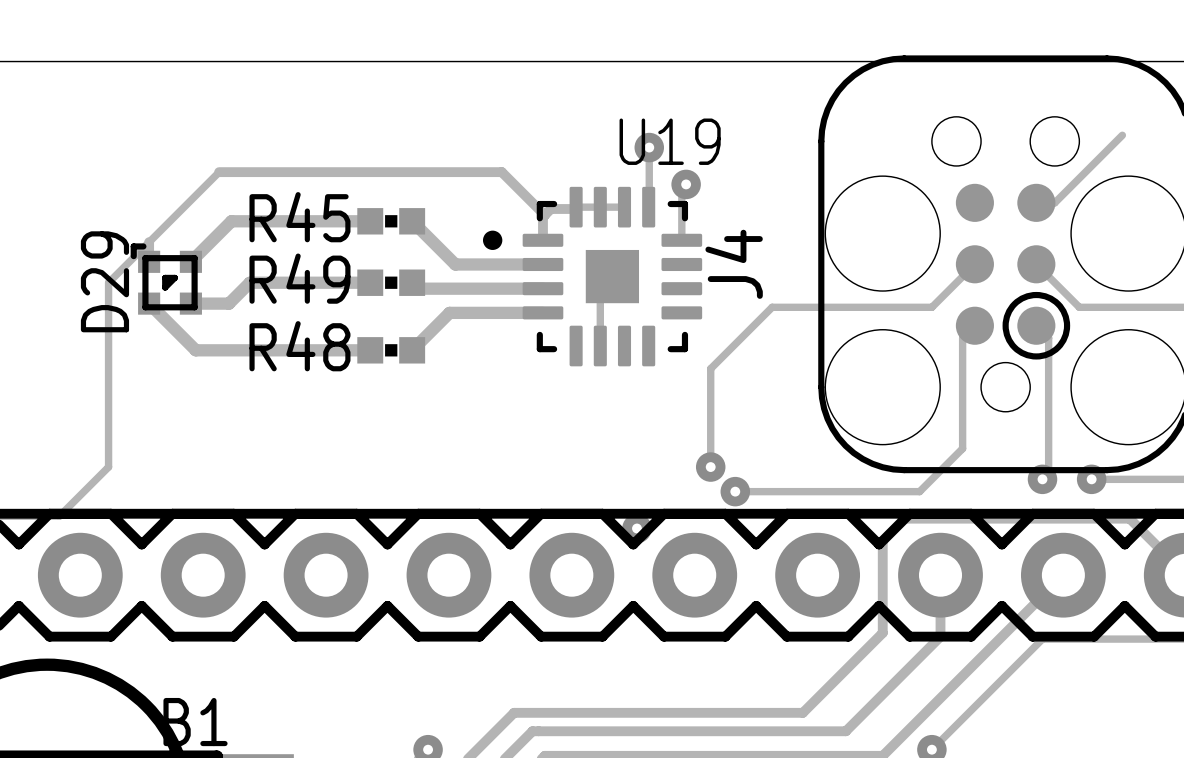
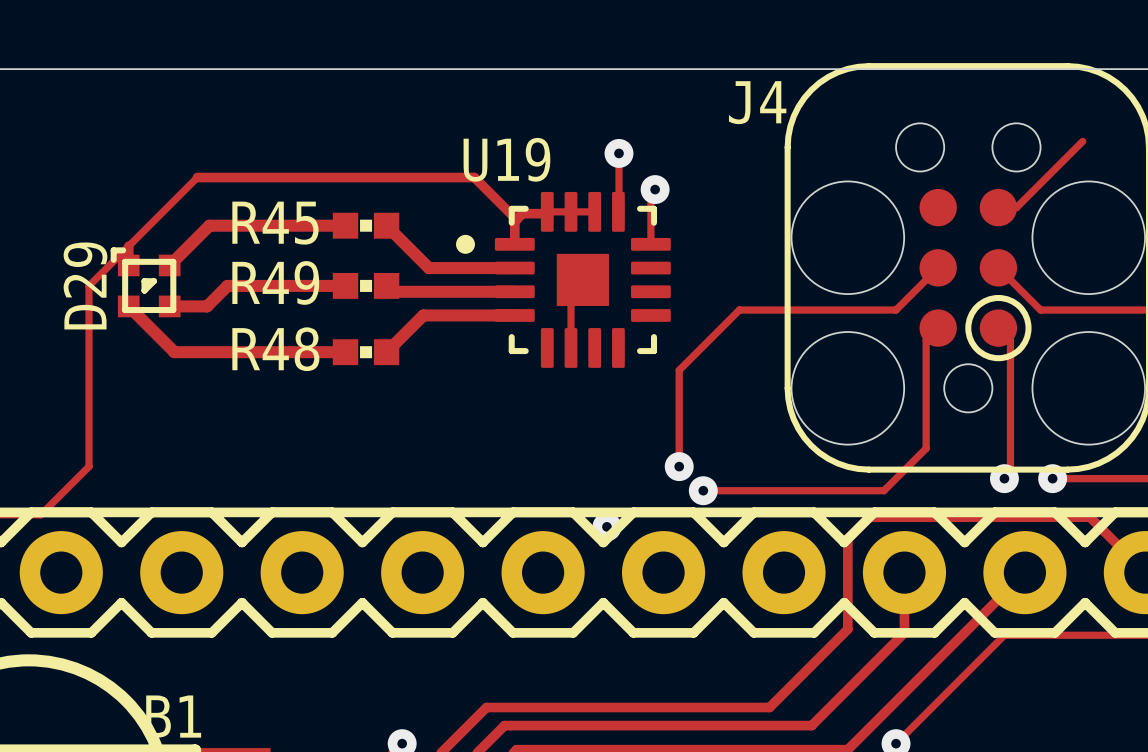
U19 name position: U19 (670, 141) -> U19 (506, 159)
J4 name rotation: 0° (734, 264) -> 90° clockwise (757, 102)
J4 name position: J4 (734, 264) -> J4 (757, 102)

